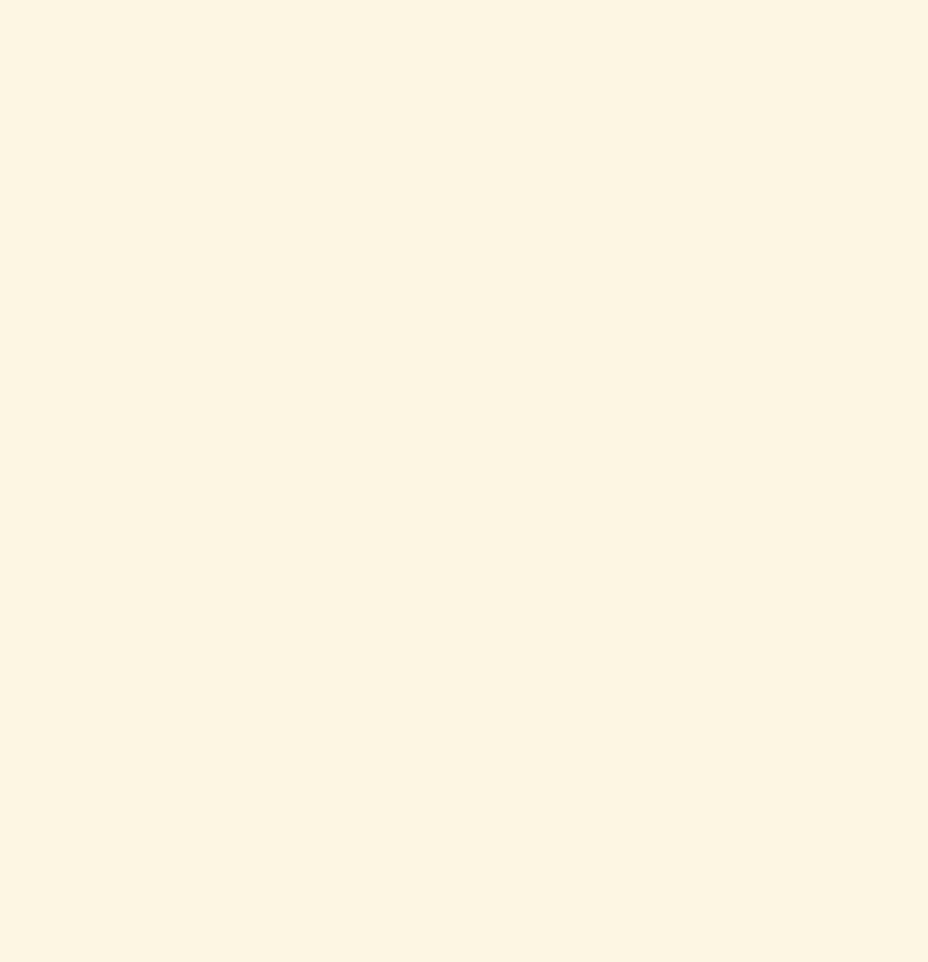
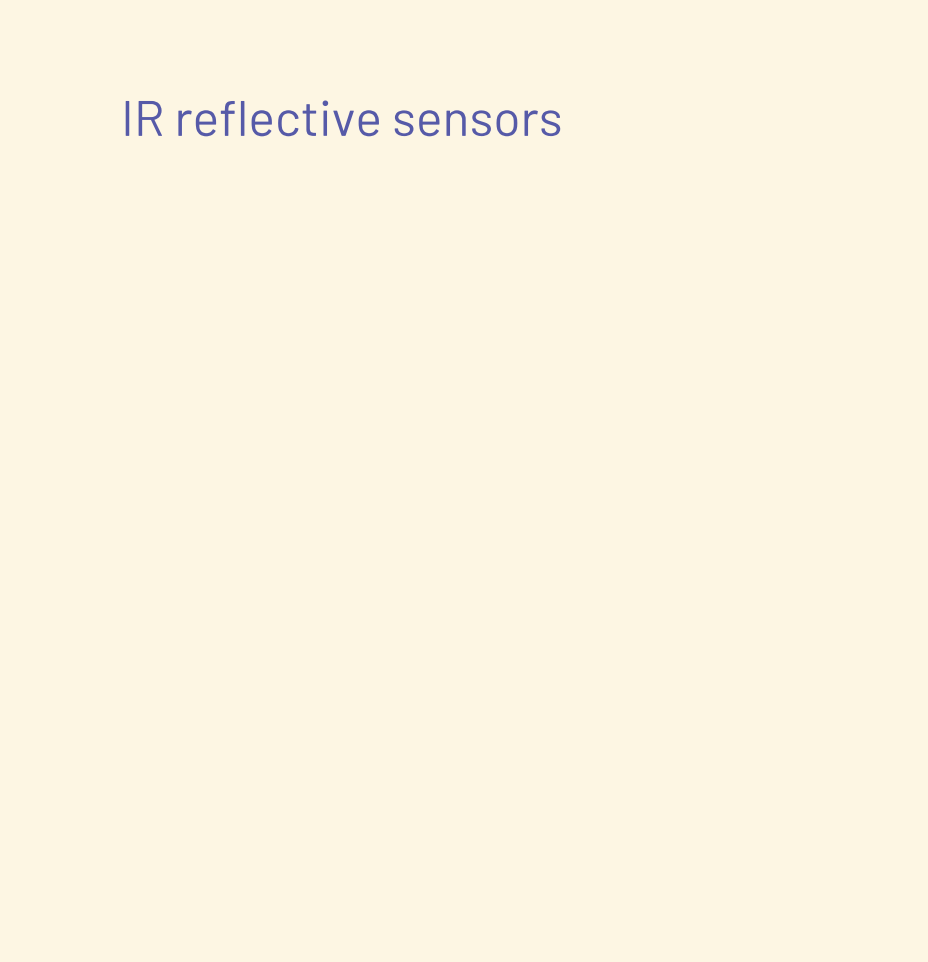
text: none -> IR reflective sensors (342, 118)

